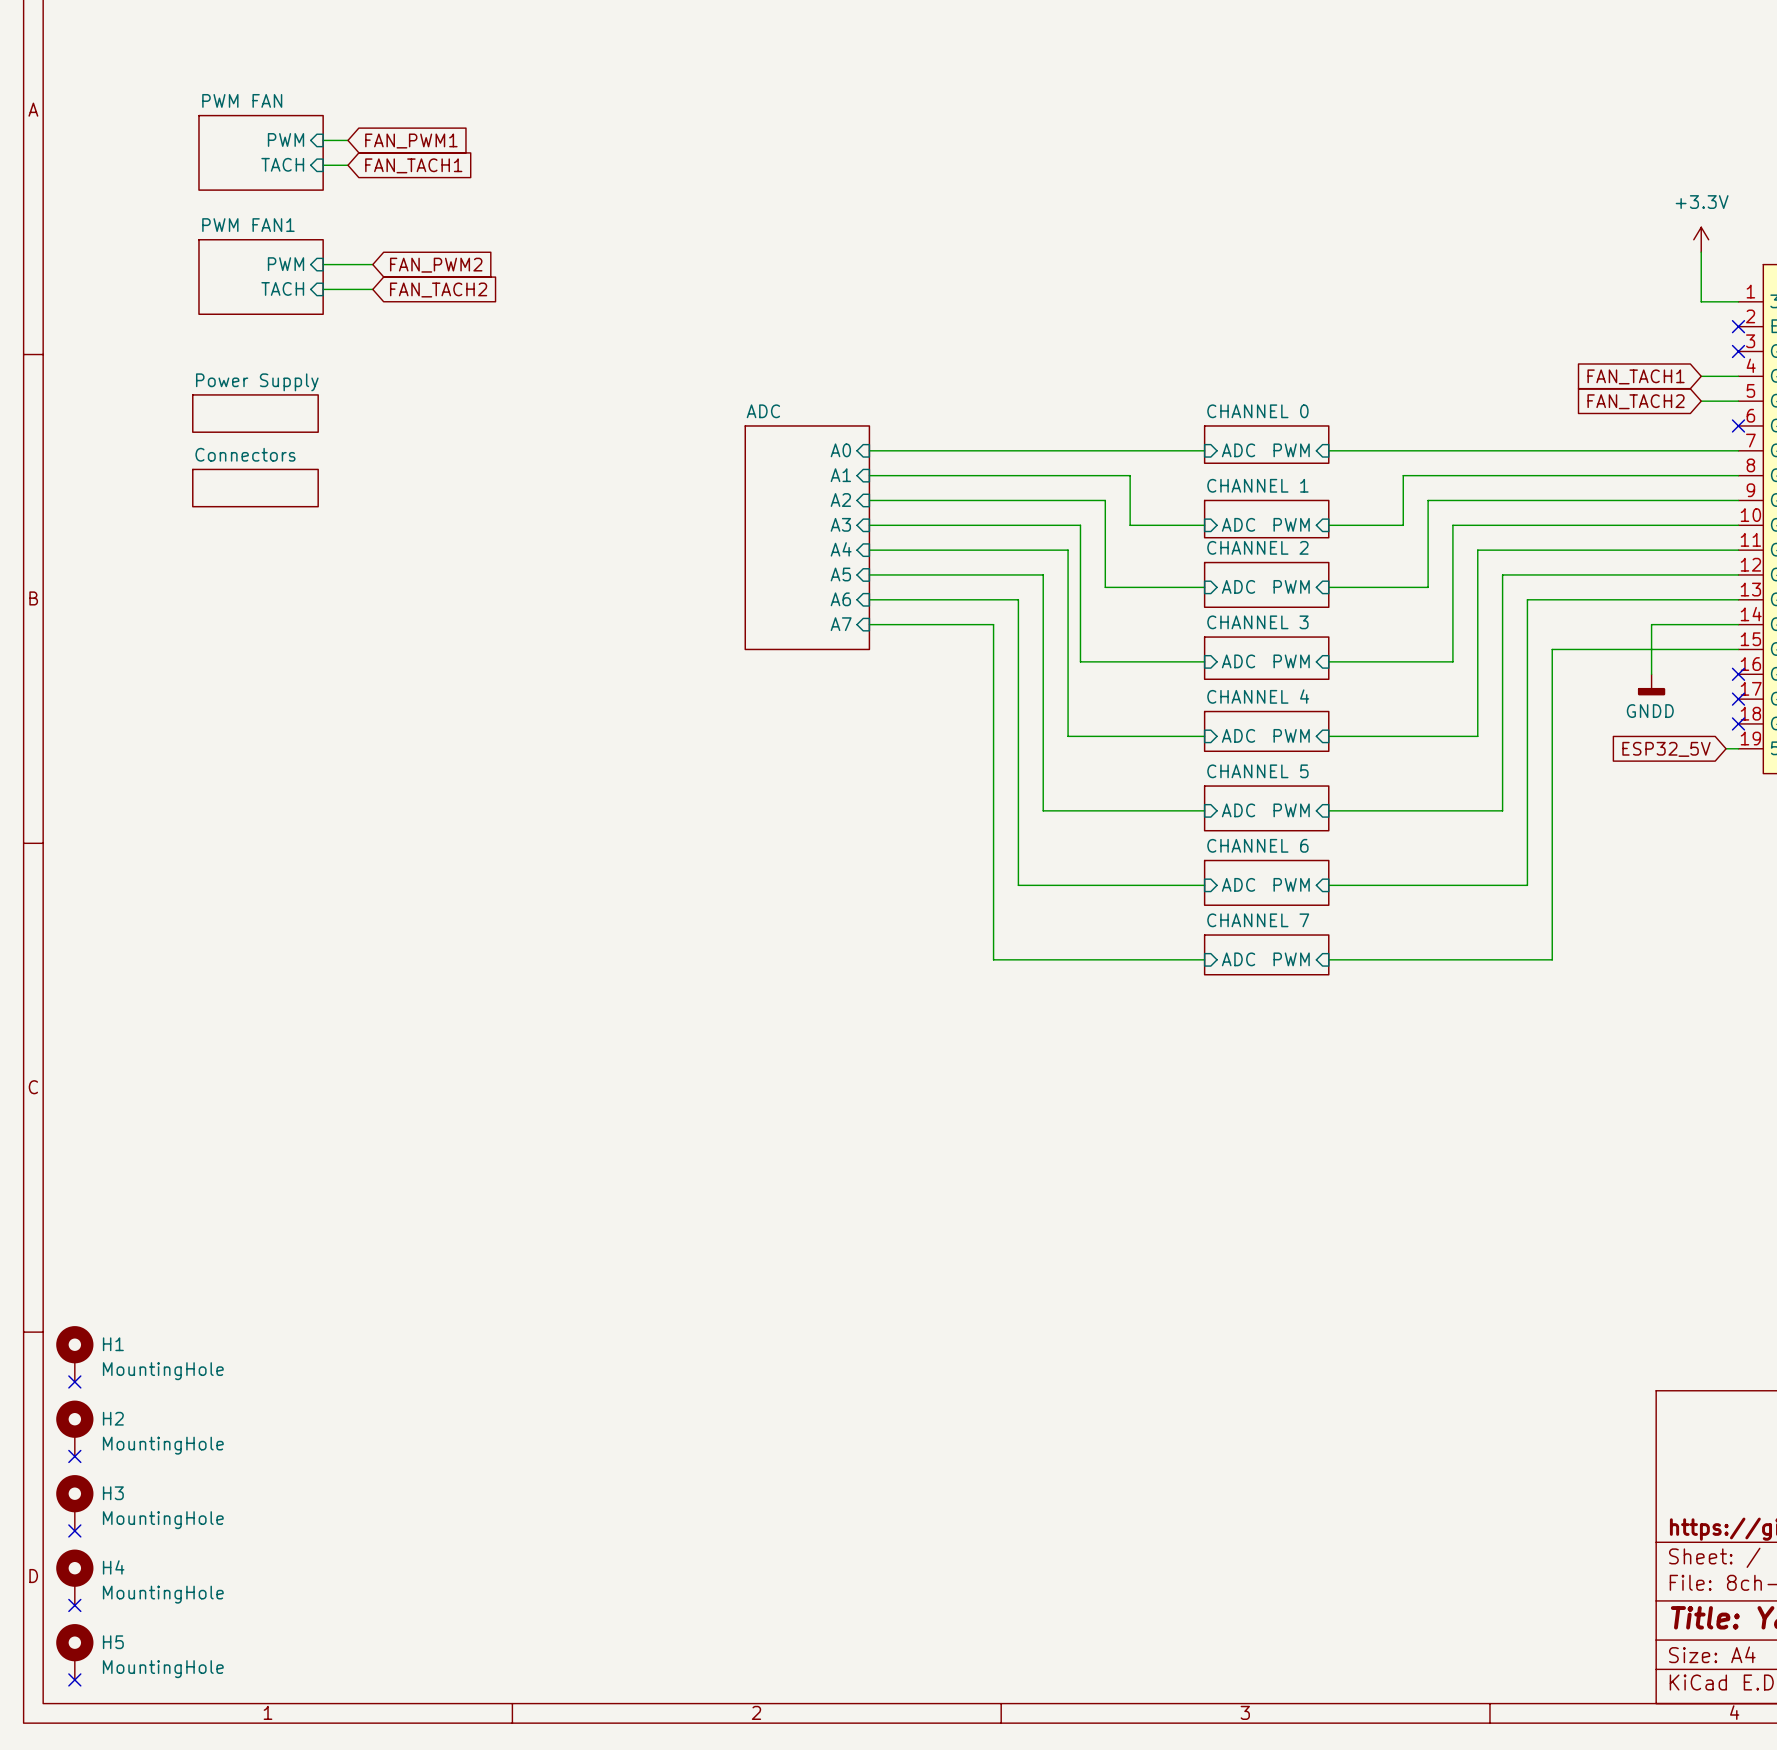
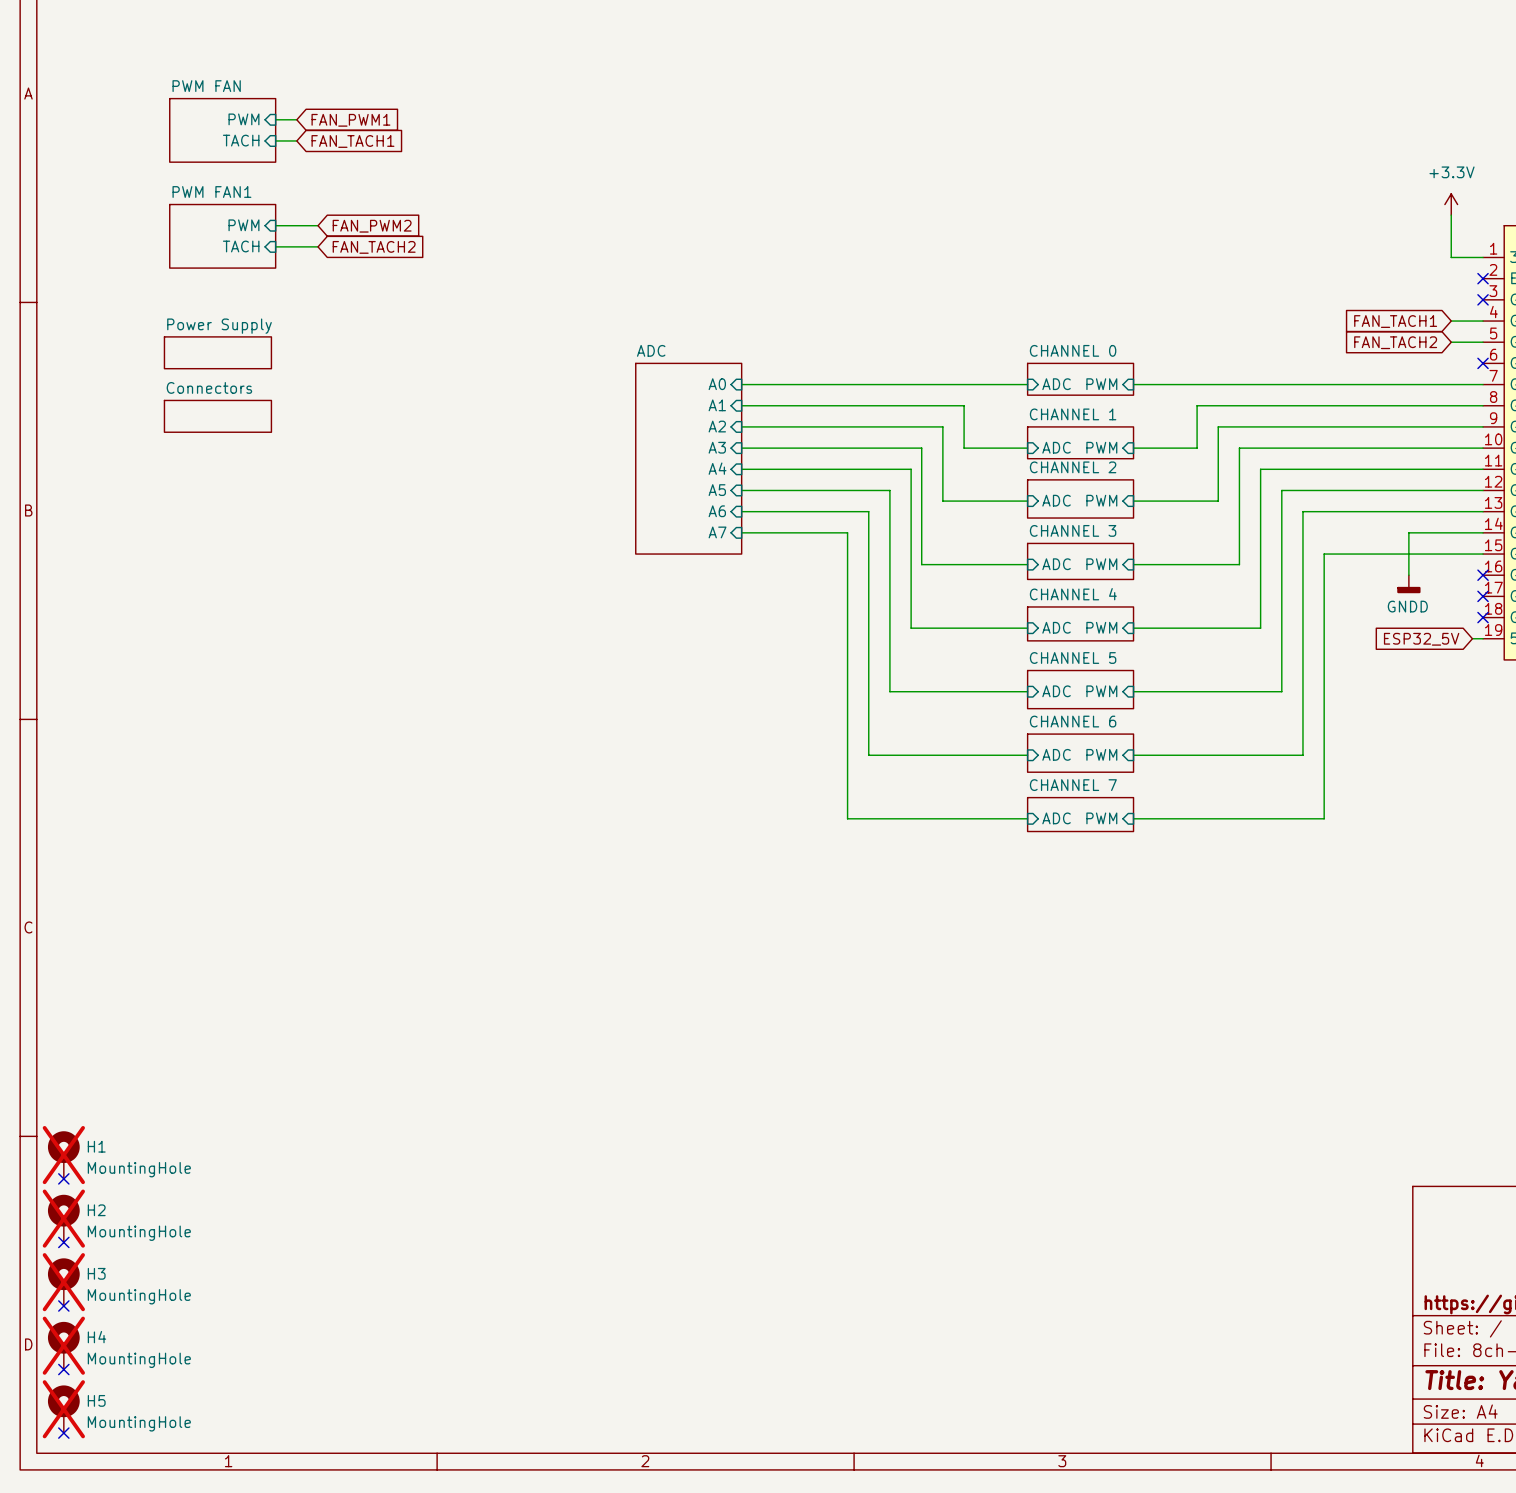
H1 do-not-place cross: none -> (63, 1155)
H2 do-not-place cross: none -> (63, 1218)
H3 do-not-place cross: none -> (63, 1282)
H4 do-not-place cross: none -> (63, 1345)
H5 do-not-place cross: none -> (63, 1409)

